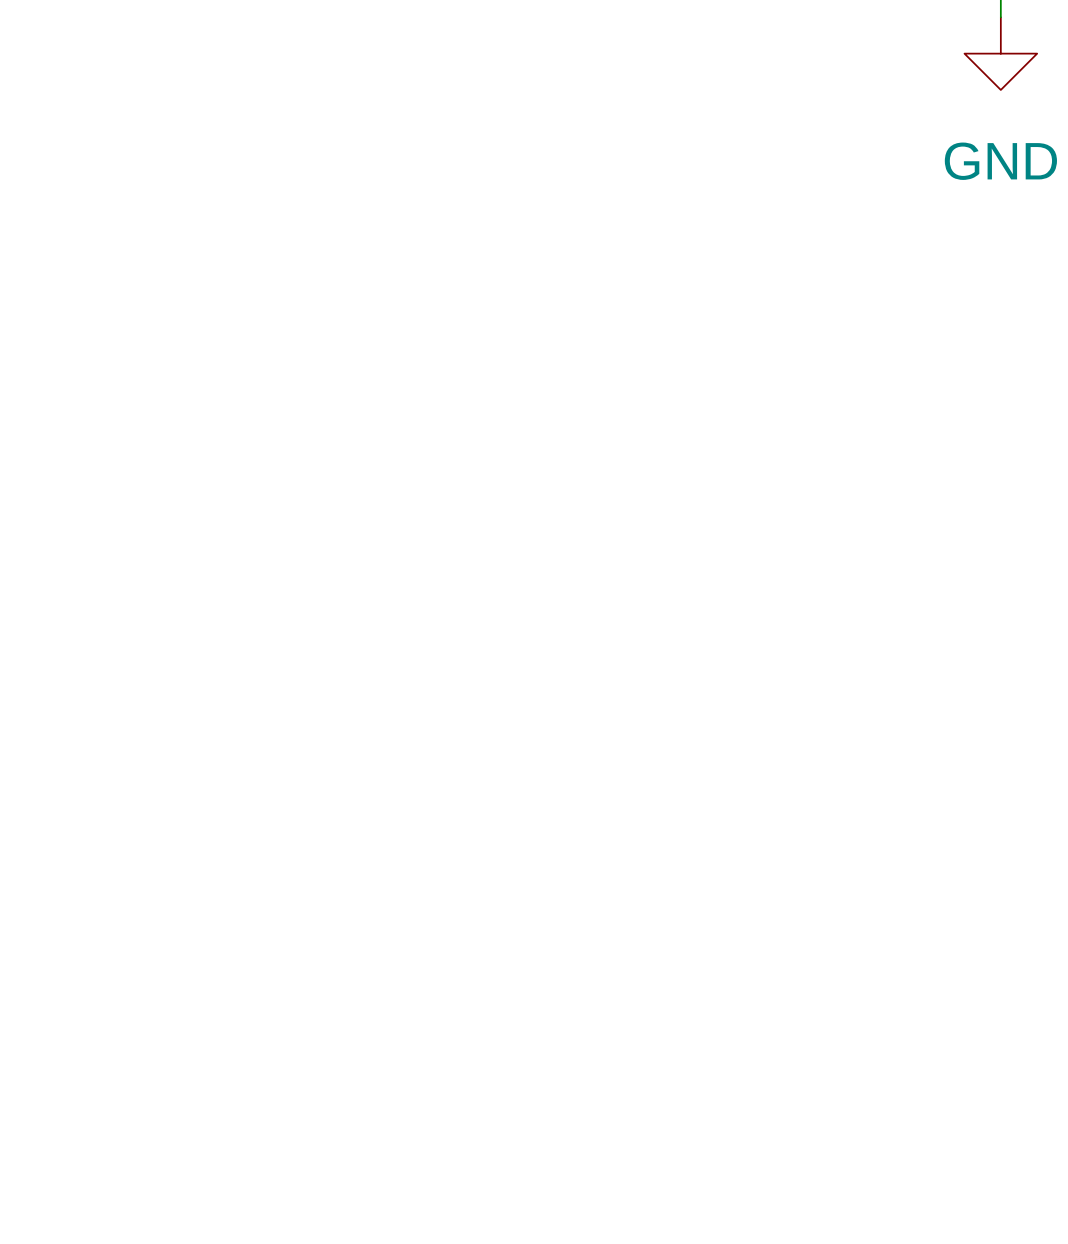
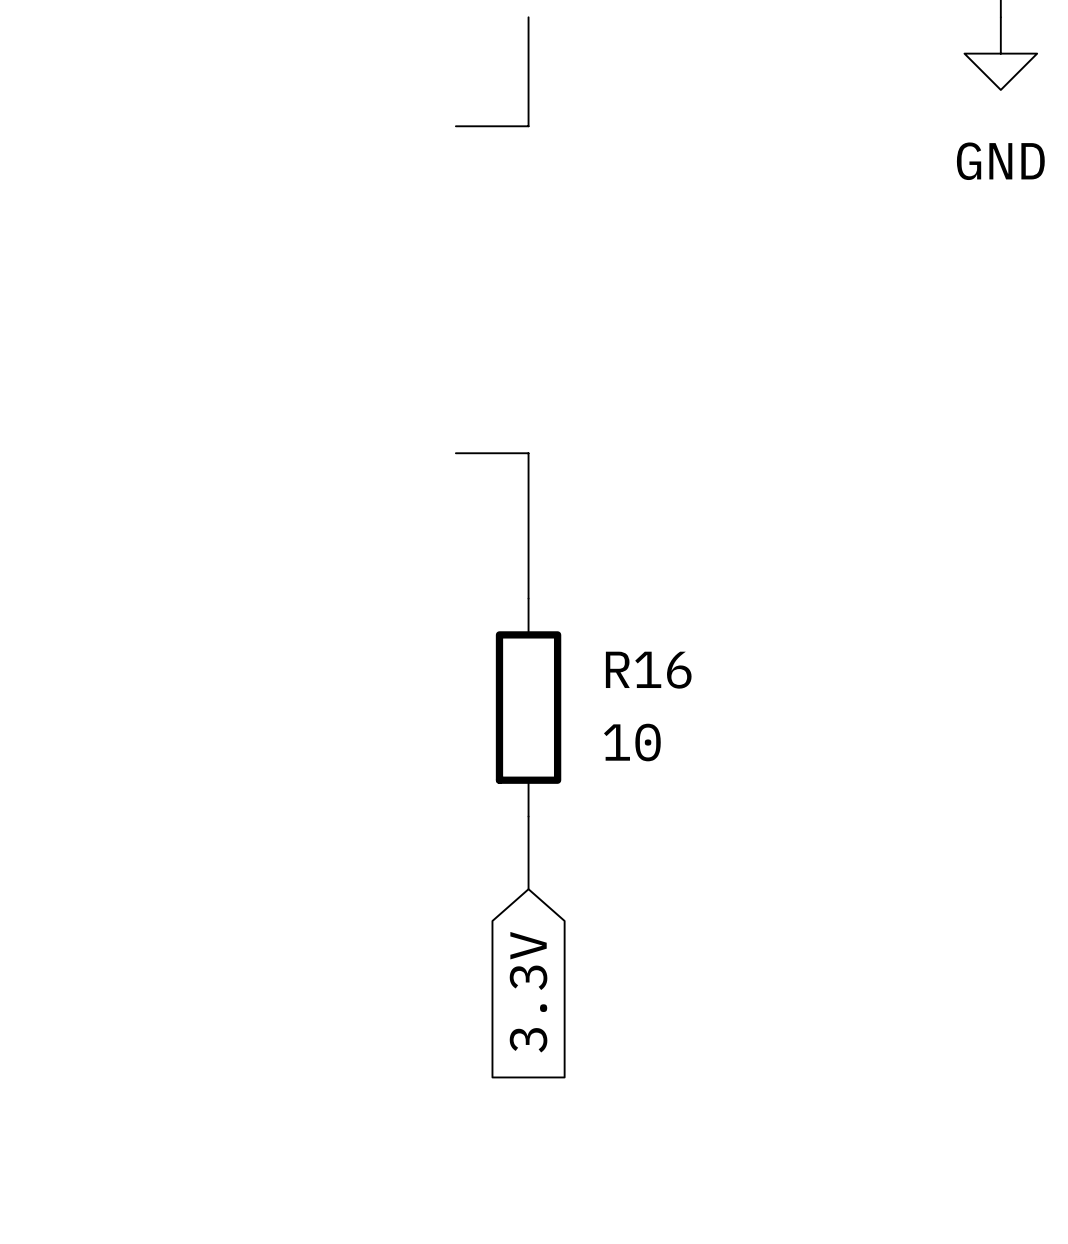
wire: none -> (528, 17) (528, 126) (455, 126)
wire: none -> (455, 453) (528, 453) (528, 598)
R16: none -> 10 (528, 707)
wire: none -> (528, 816) (528, 889)
global label: none -> 3.3V (528, 992)

